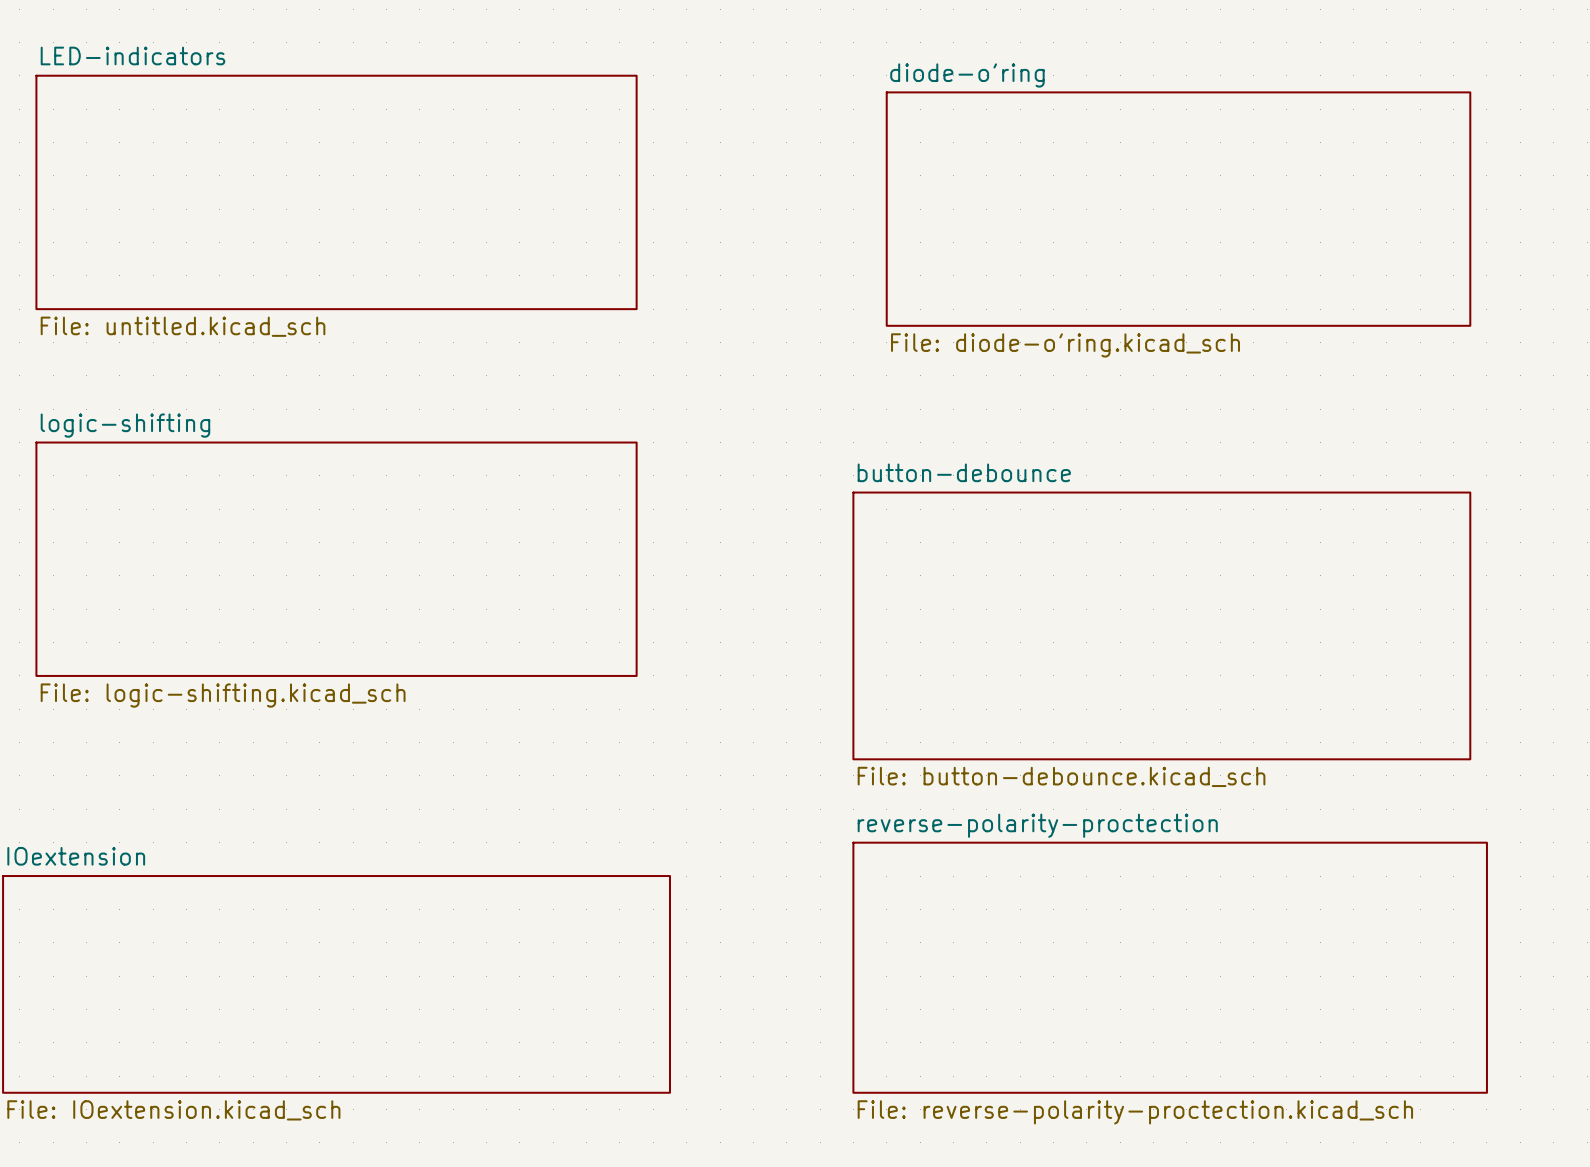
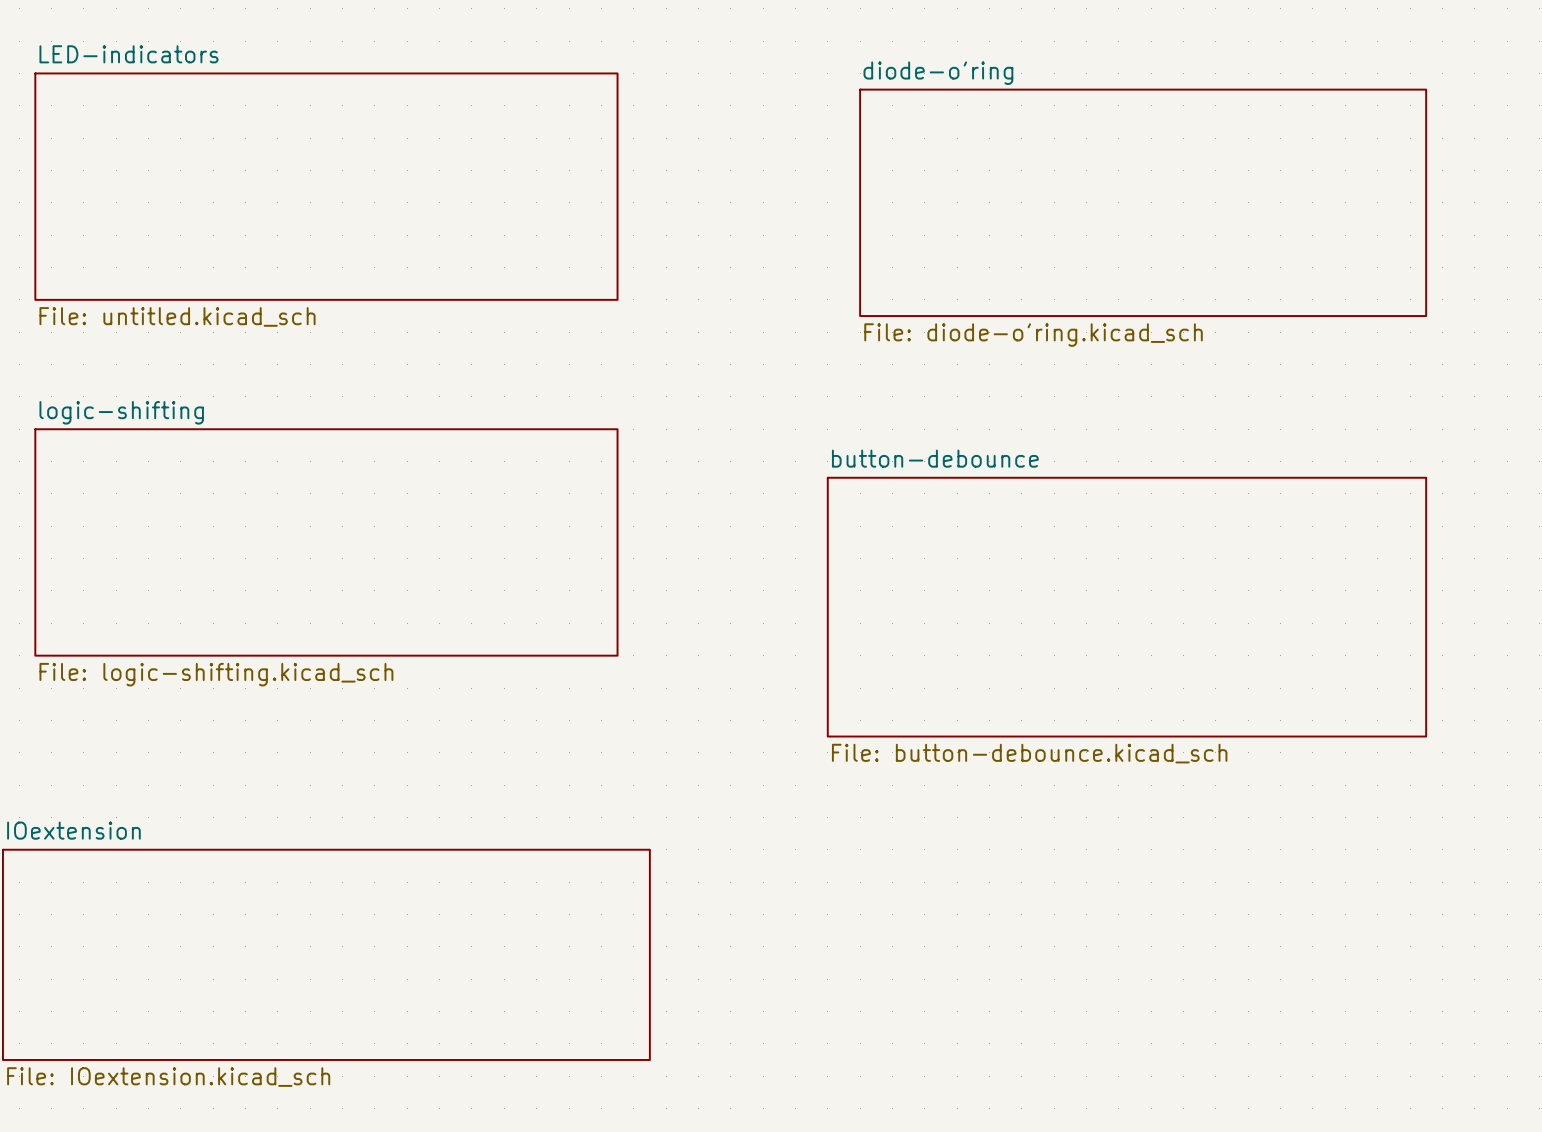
sheet reverse-polarity-proctection: File: reverse-polarity-proctection.kicad_sch (1170, 967) -> none

